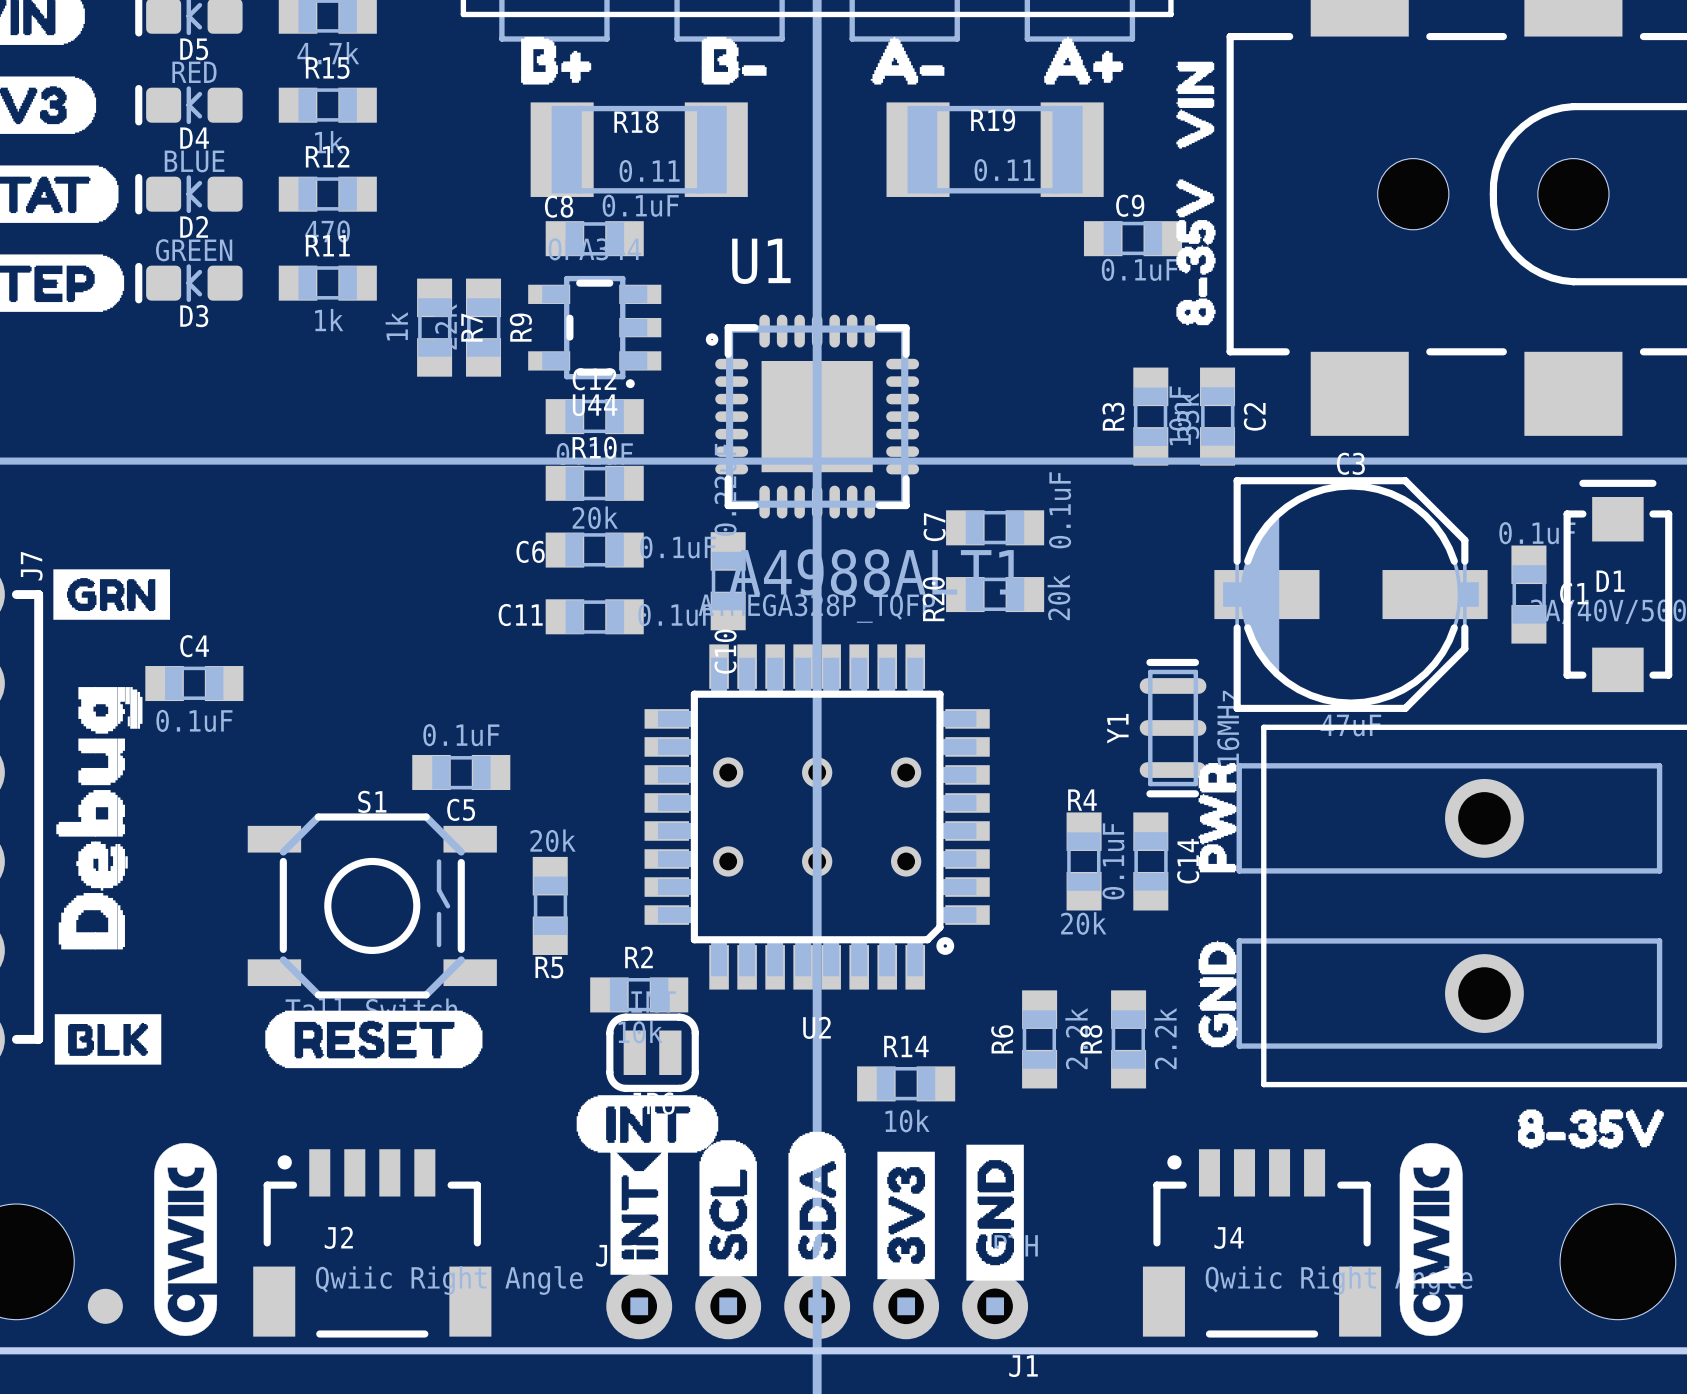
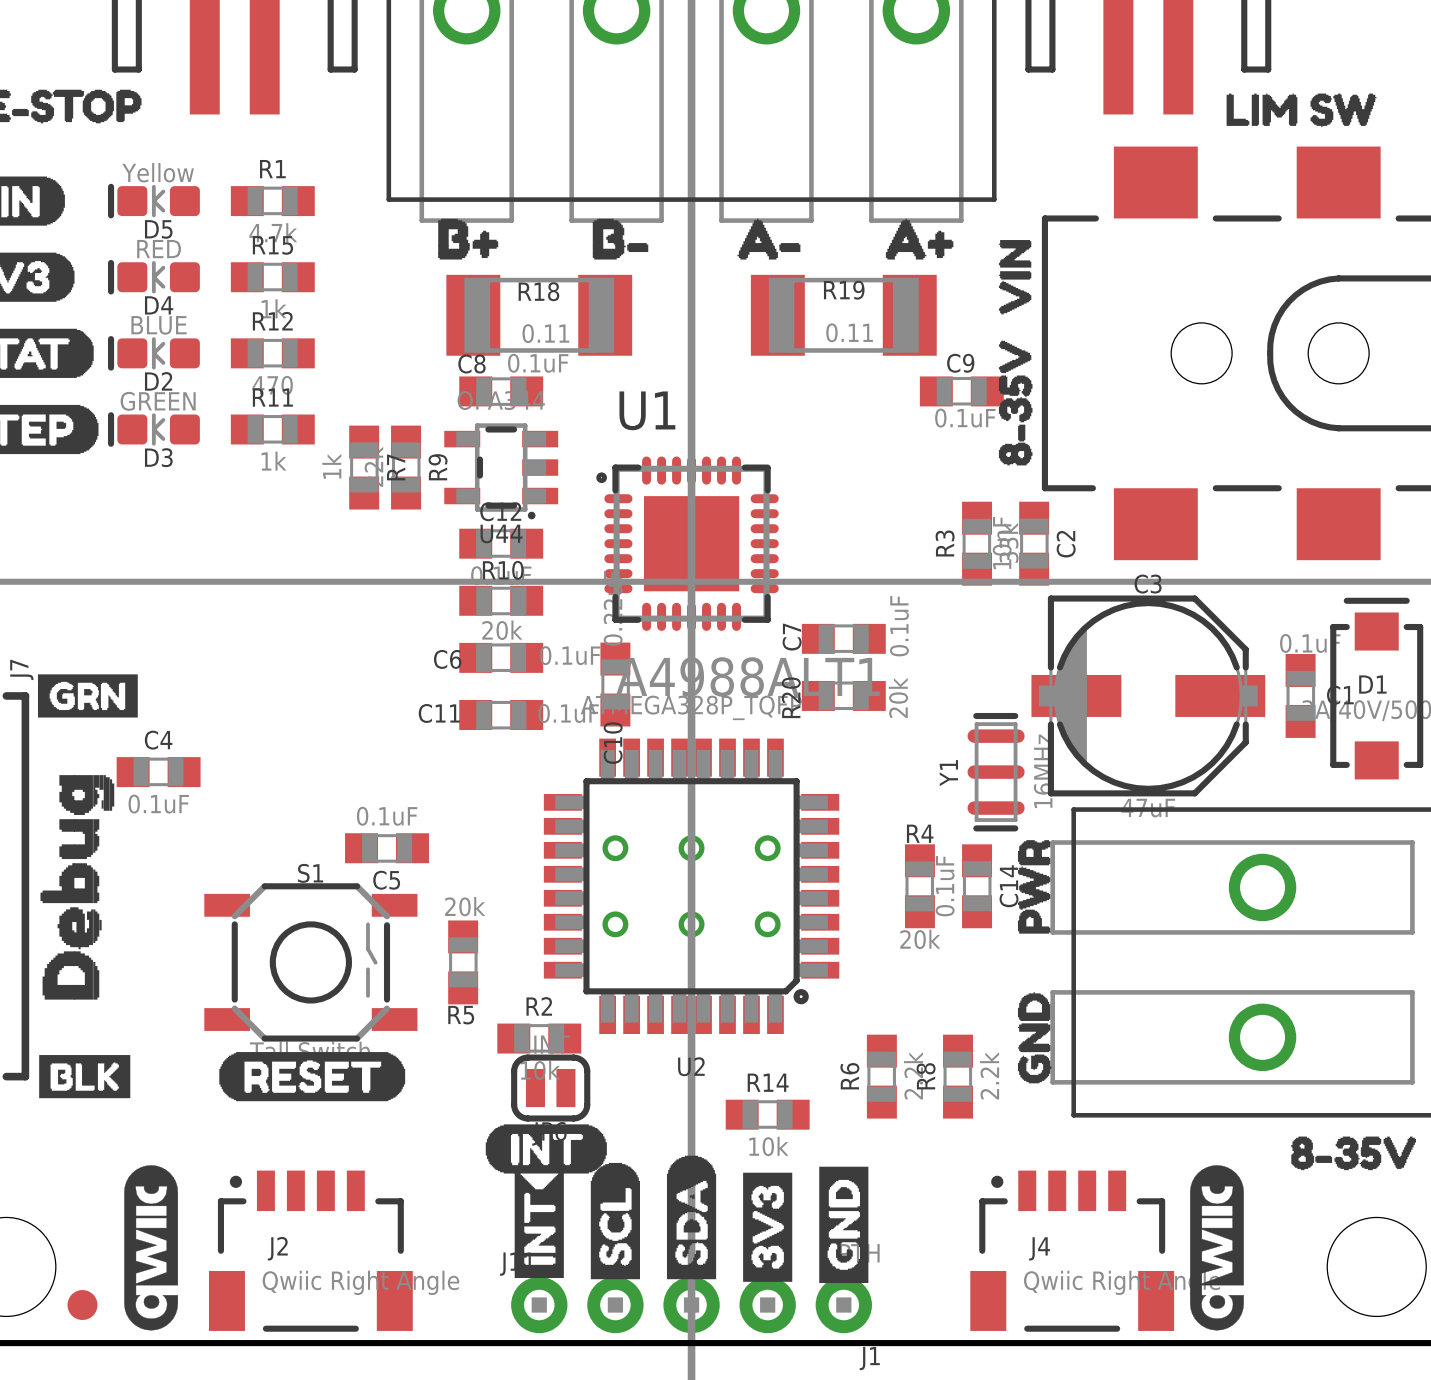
Y1 position: (1173, 728) -> (996, 772)
R4 position: (1084, 861) -> (919, 886)
C14 position: (1150, 861) -> (977, 886)

